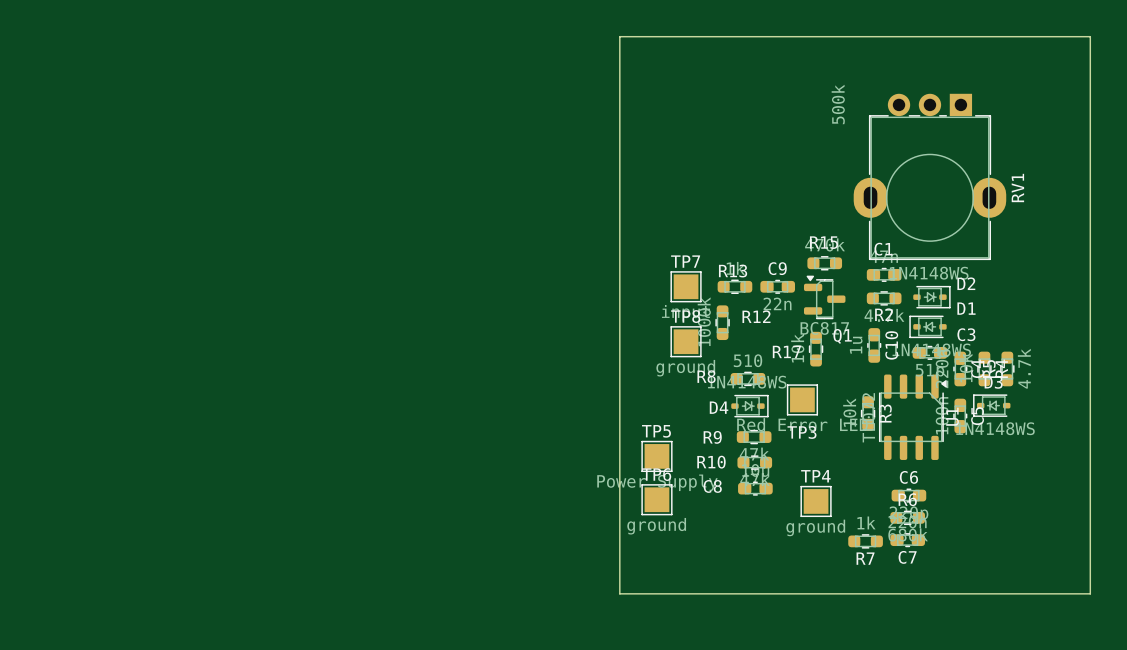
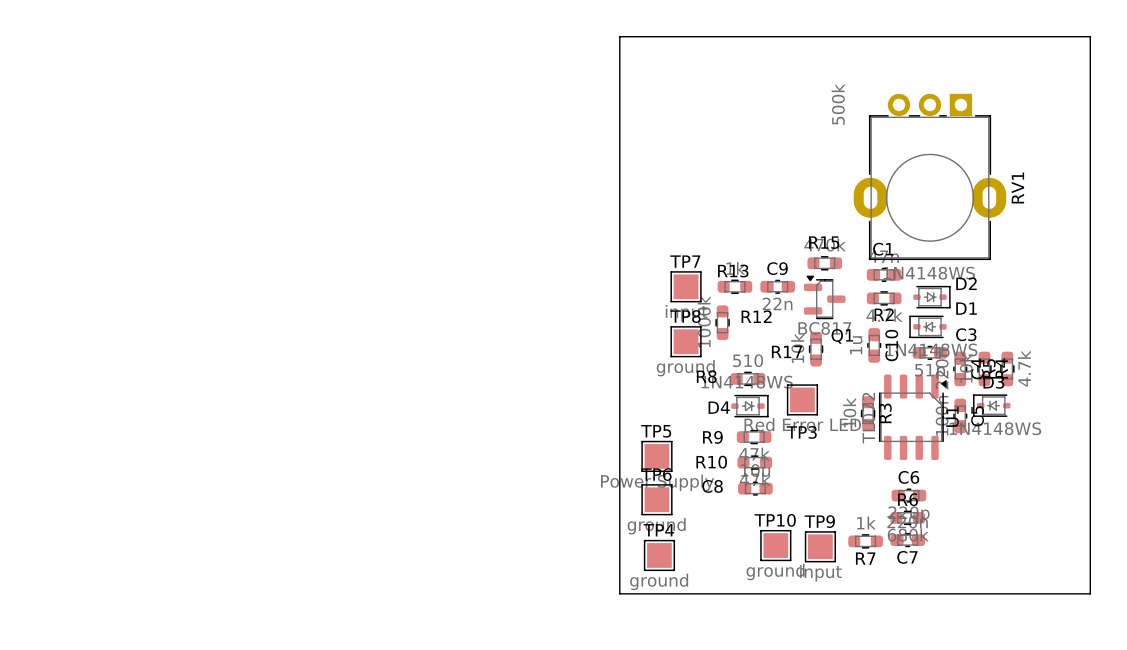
TP4 position: (816, 501) -> (659, 555)
TP10: none -> ground (775, 545)
TP9: none -> input (820, 546)

